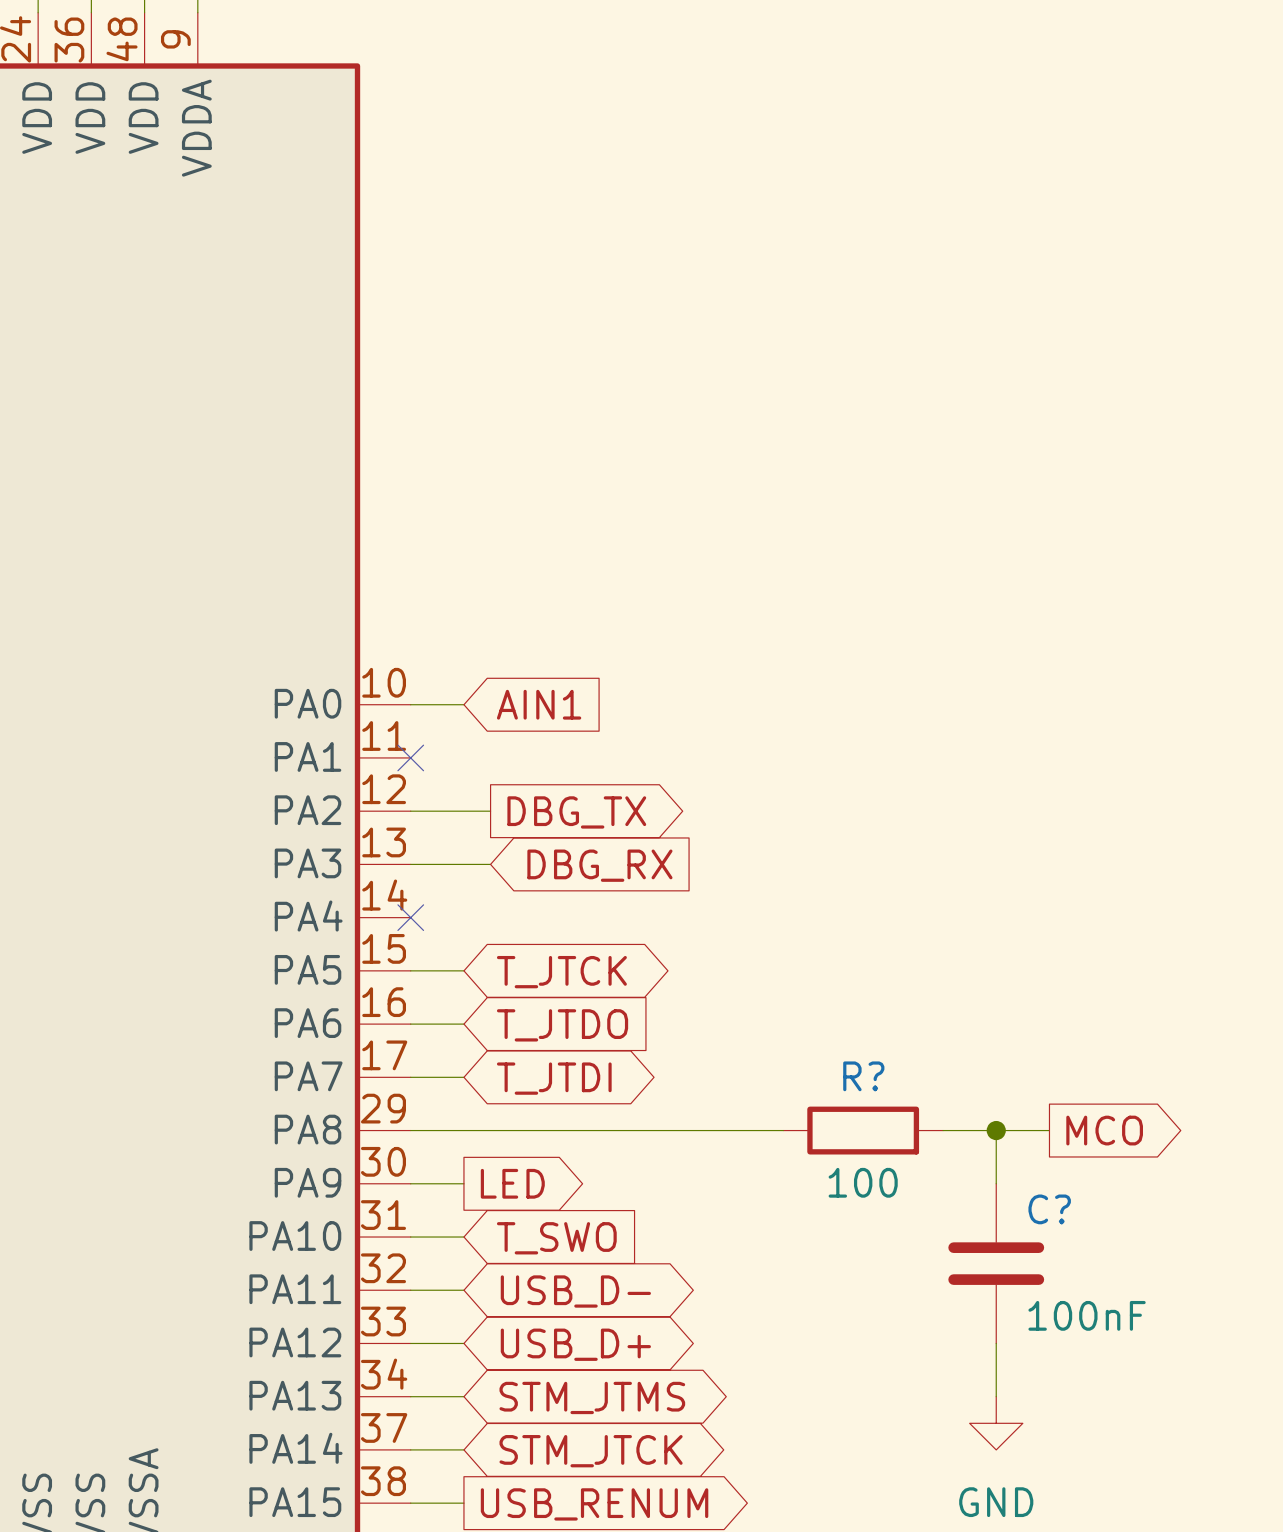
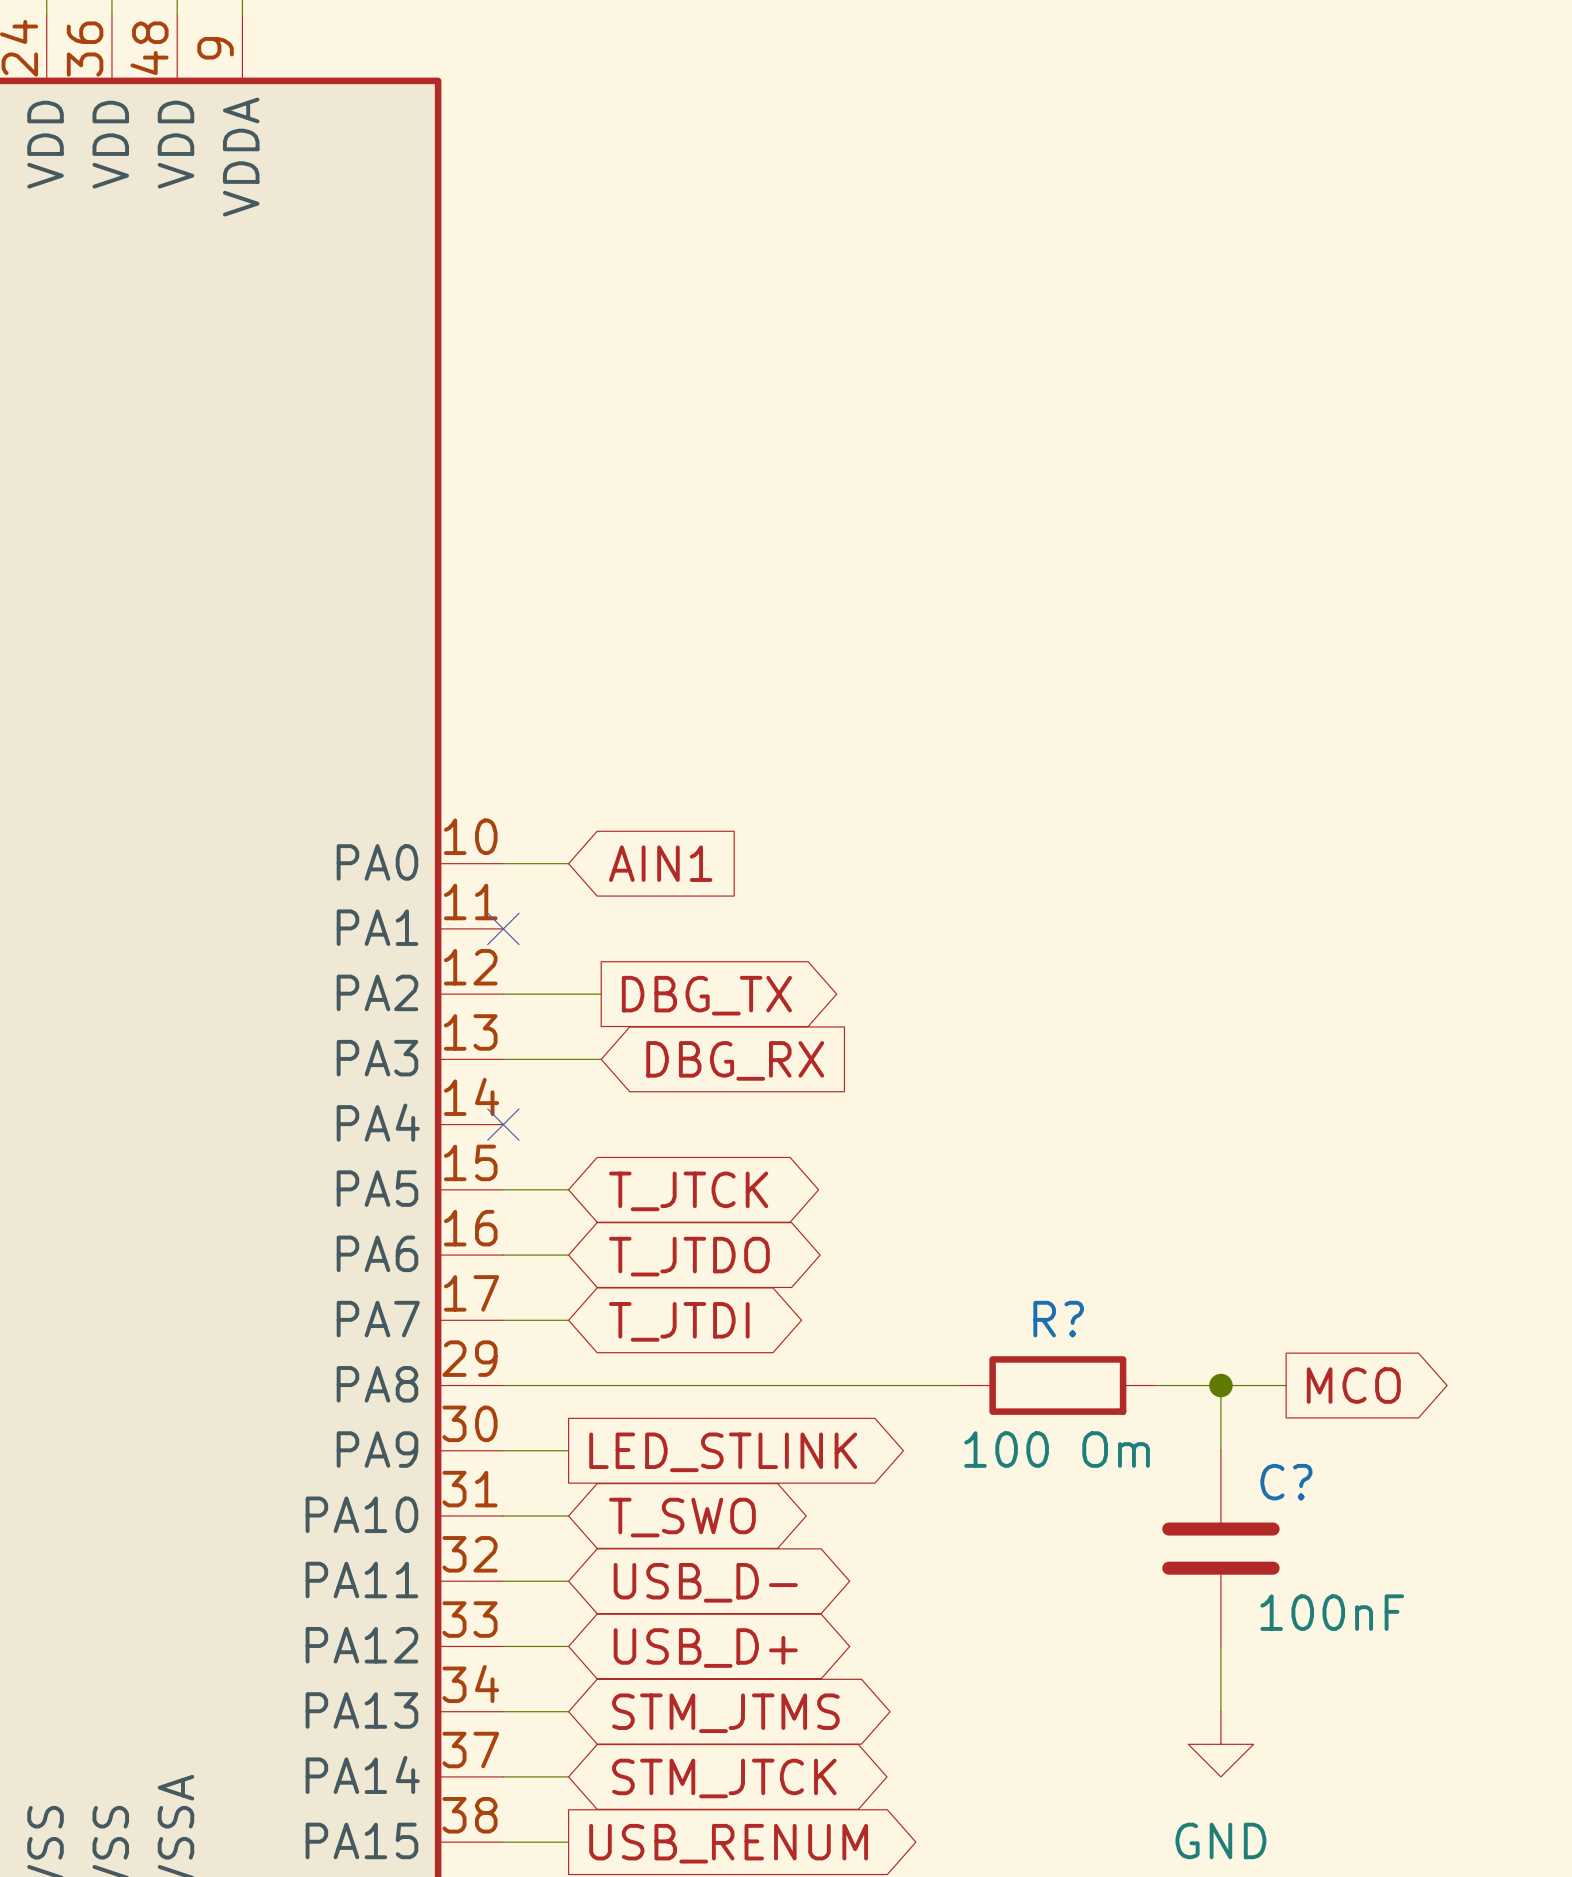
global label shape: input (562, 1025) -> bidirectional (689, 1256)
R? value: 100 (863, 1182) -> 100 Om (1057, 1449)
global label: LED (512, 1183) -> LED_STLINK (723, 1452)
global label shape: input (556, 1238) -> bidirectional (682, 1517)

